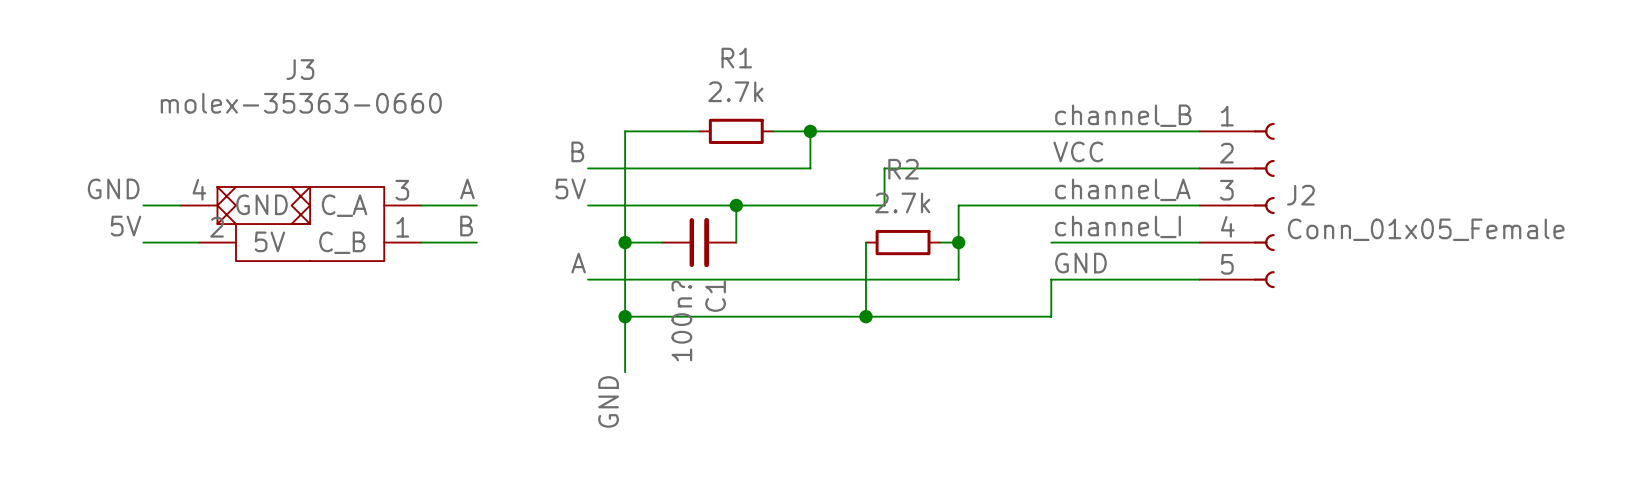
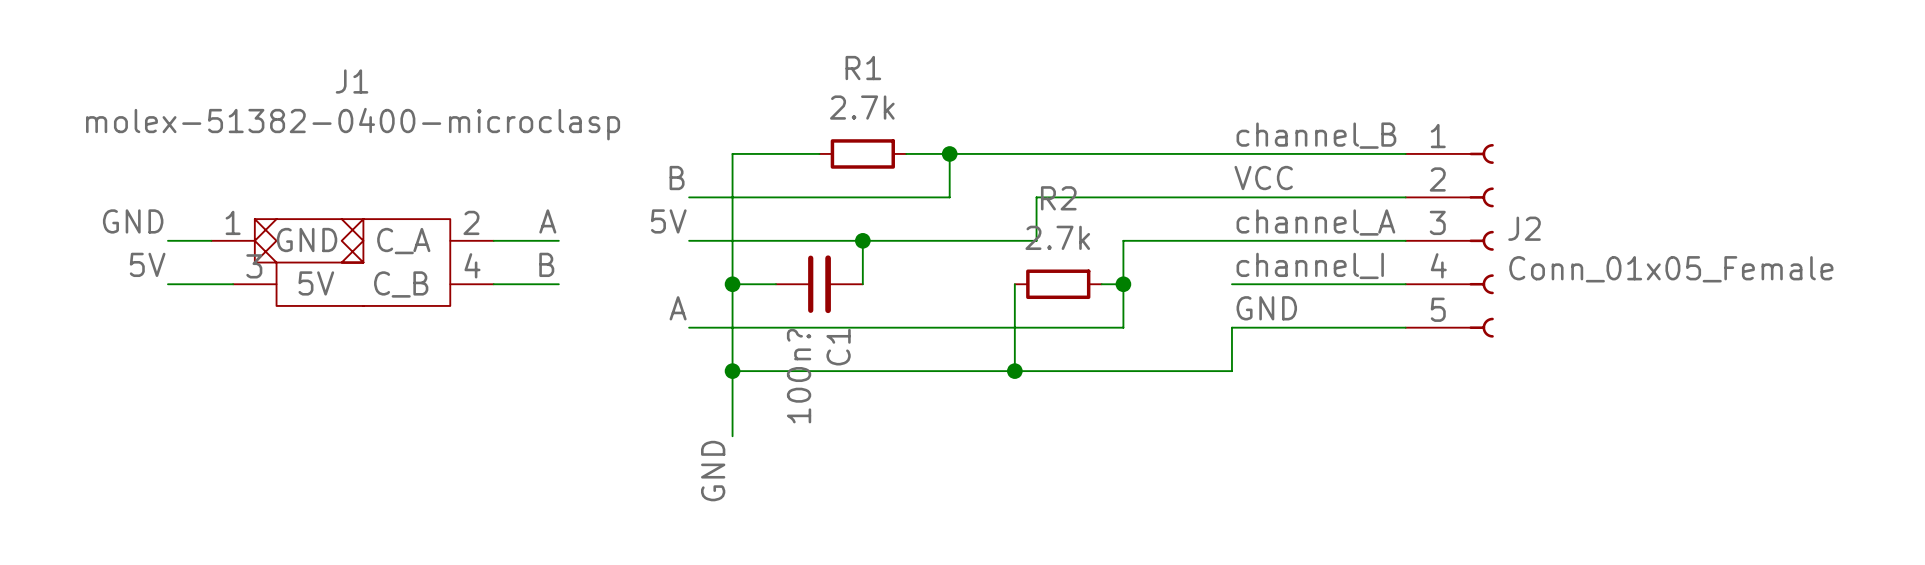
J3 name: J3 (300, 69) -> J1 (352, 81)
J3 value: molex-35363-0660 (301, 103) -> molex-51382-0400-microclasp (353, 124)
J3 pin number: 4 (199, 189) -> 1 (233, 222)
J3 pin number: 3 (402, 190) -> 2 (471, 222)
J3 pin number: 2 (217, 227) -> 3 (254, 266)
J3 pin number: 1 (402, 227) -> 4 (472, 265)

